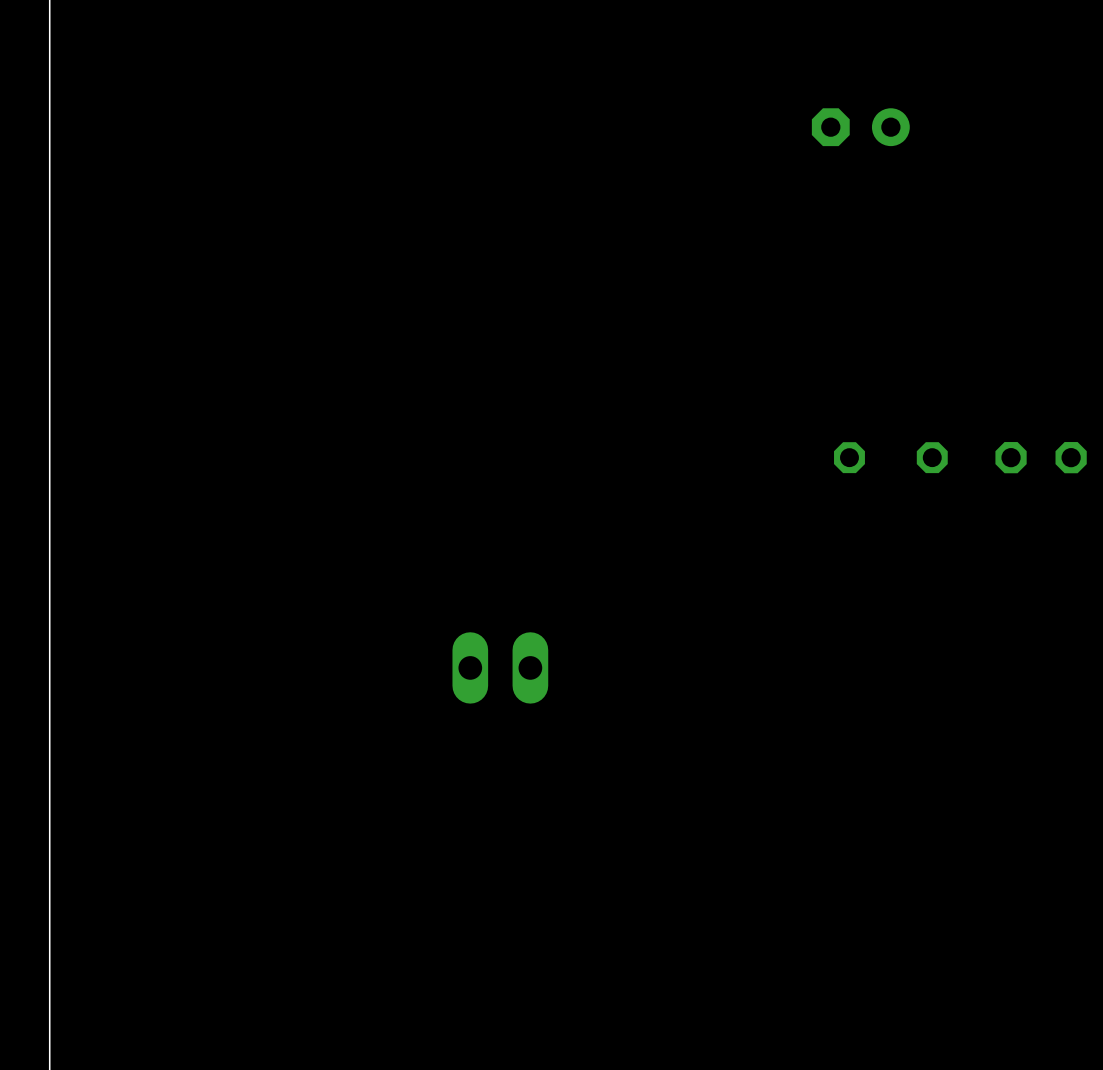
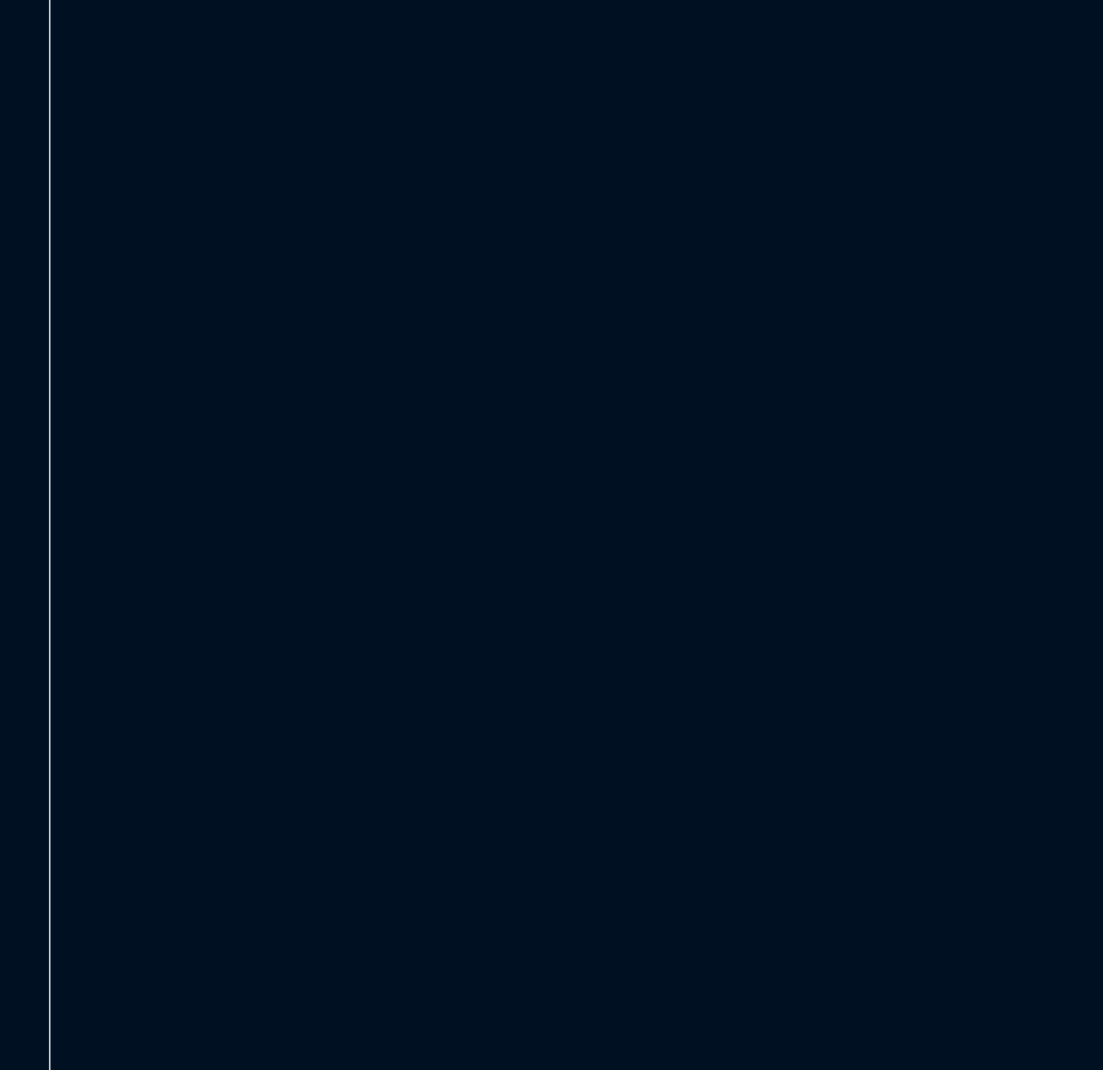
part: (860, 127) -> none
part: (890, 457) -> none
part: (1041, 457) -> none
part: (500, 667) -> none

